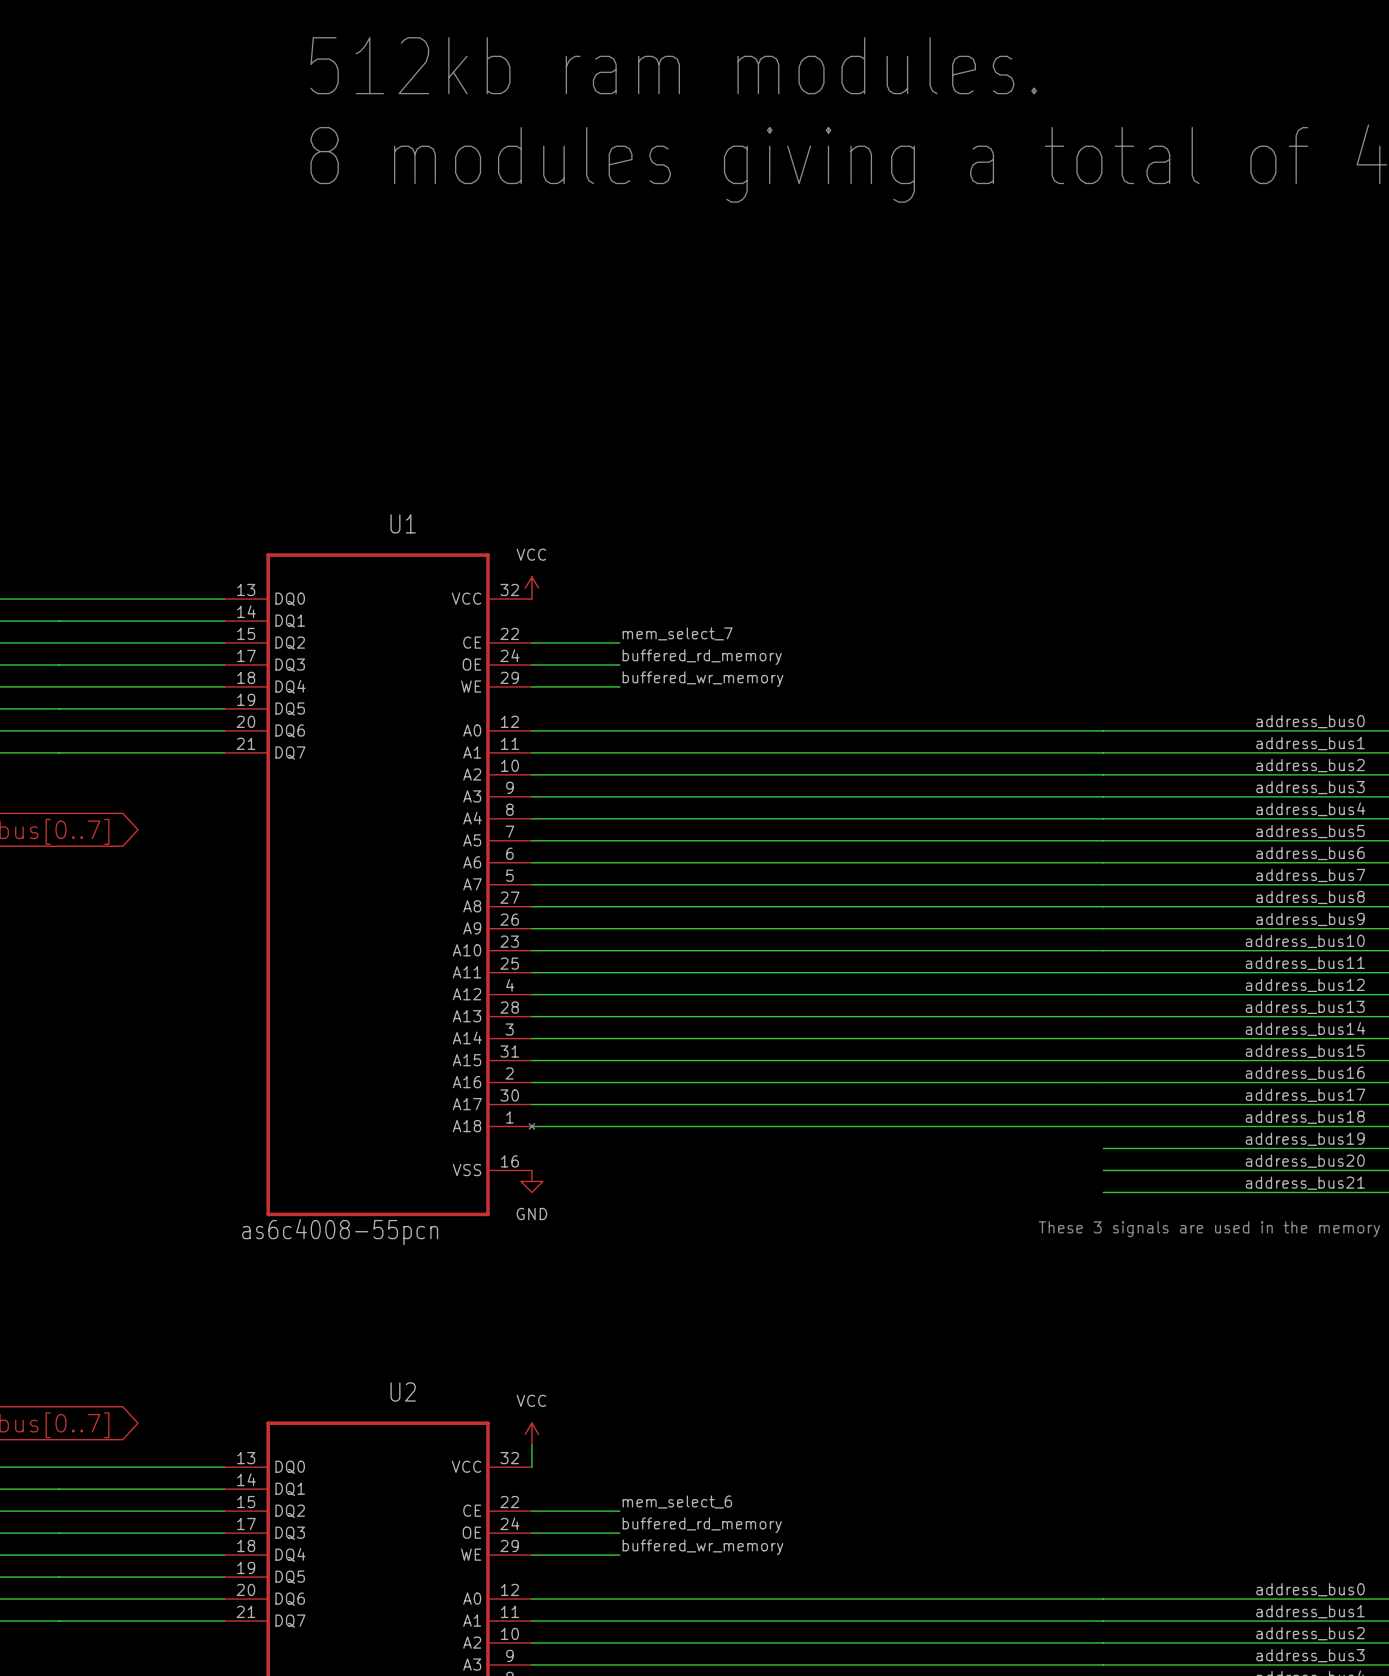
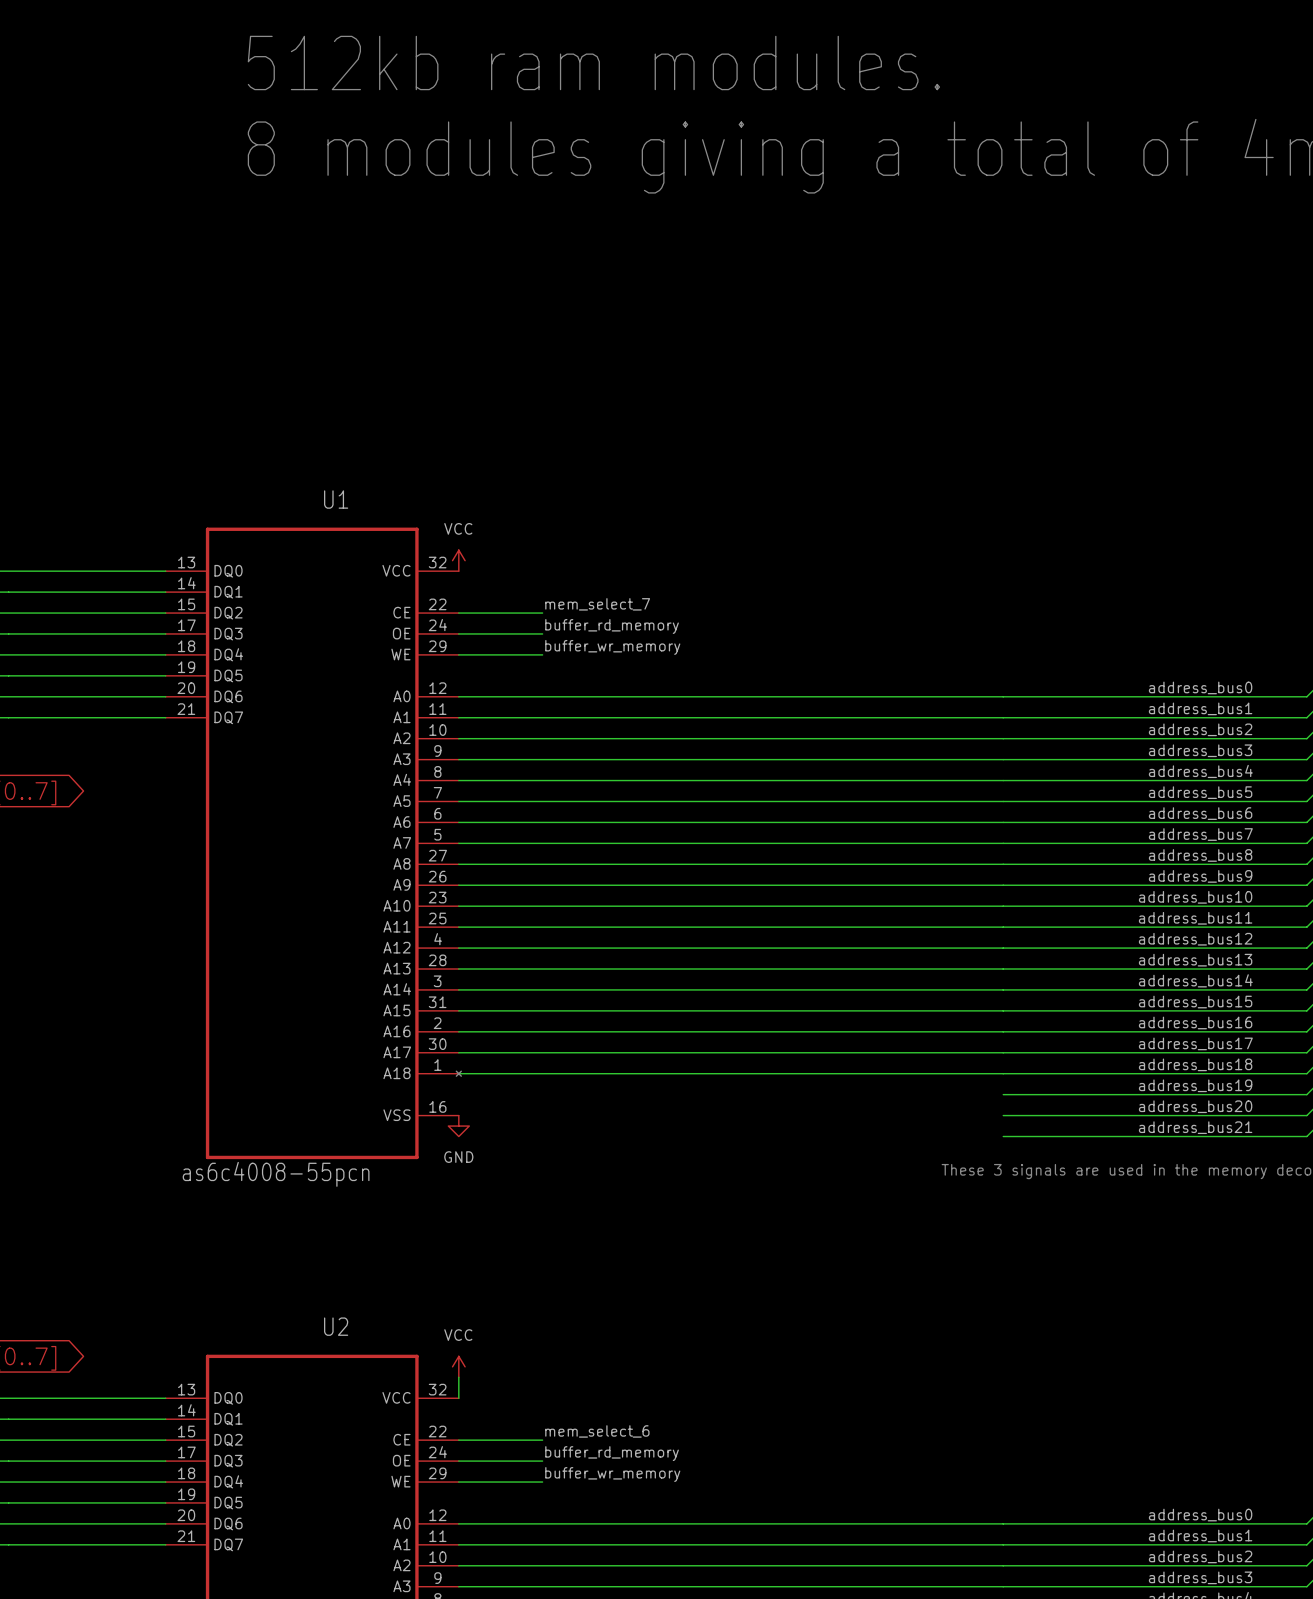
label: buffered_rd_memory (702, 657) -> buffer_rd_memory (612, 626)
label: buffered_wr_memory (702, 679) -> buffer_wr_memory (612, 647)
label: buffered_rd_memory (702, 1525) -> buffer_rd_memory (612, 1453)
label: buffered_wr_memory (702, 1547) -> buffer_wr_memory (612, 1474)

